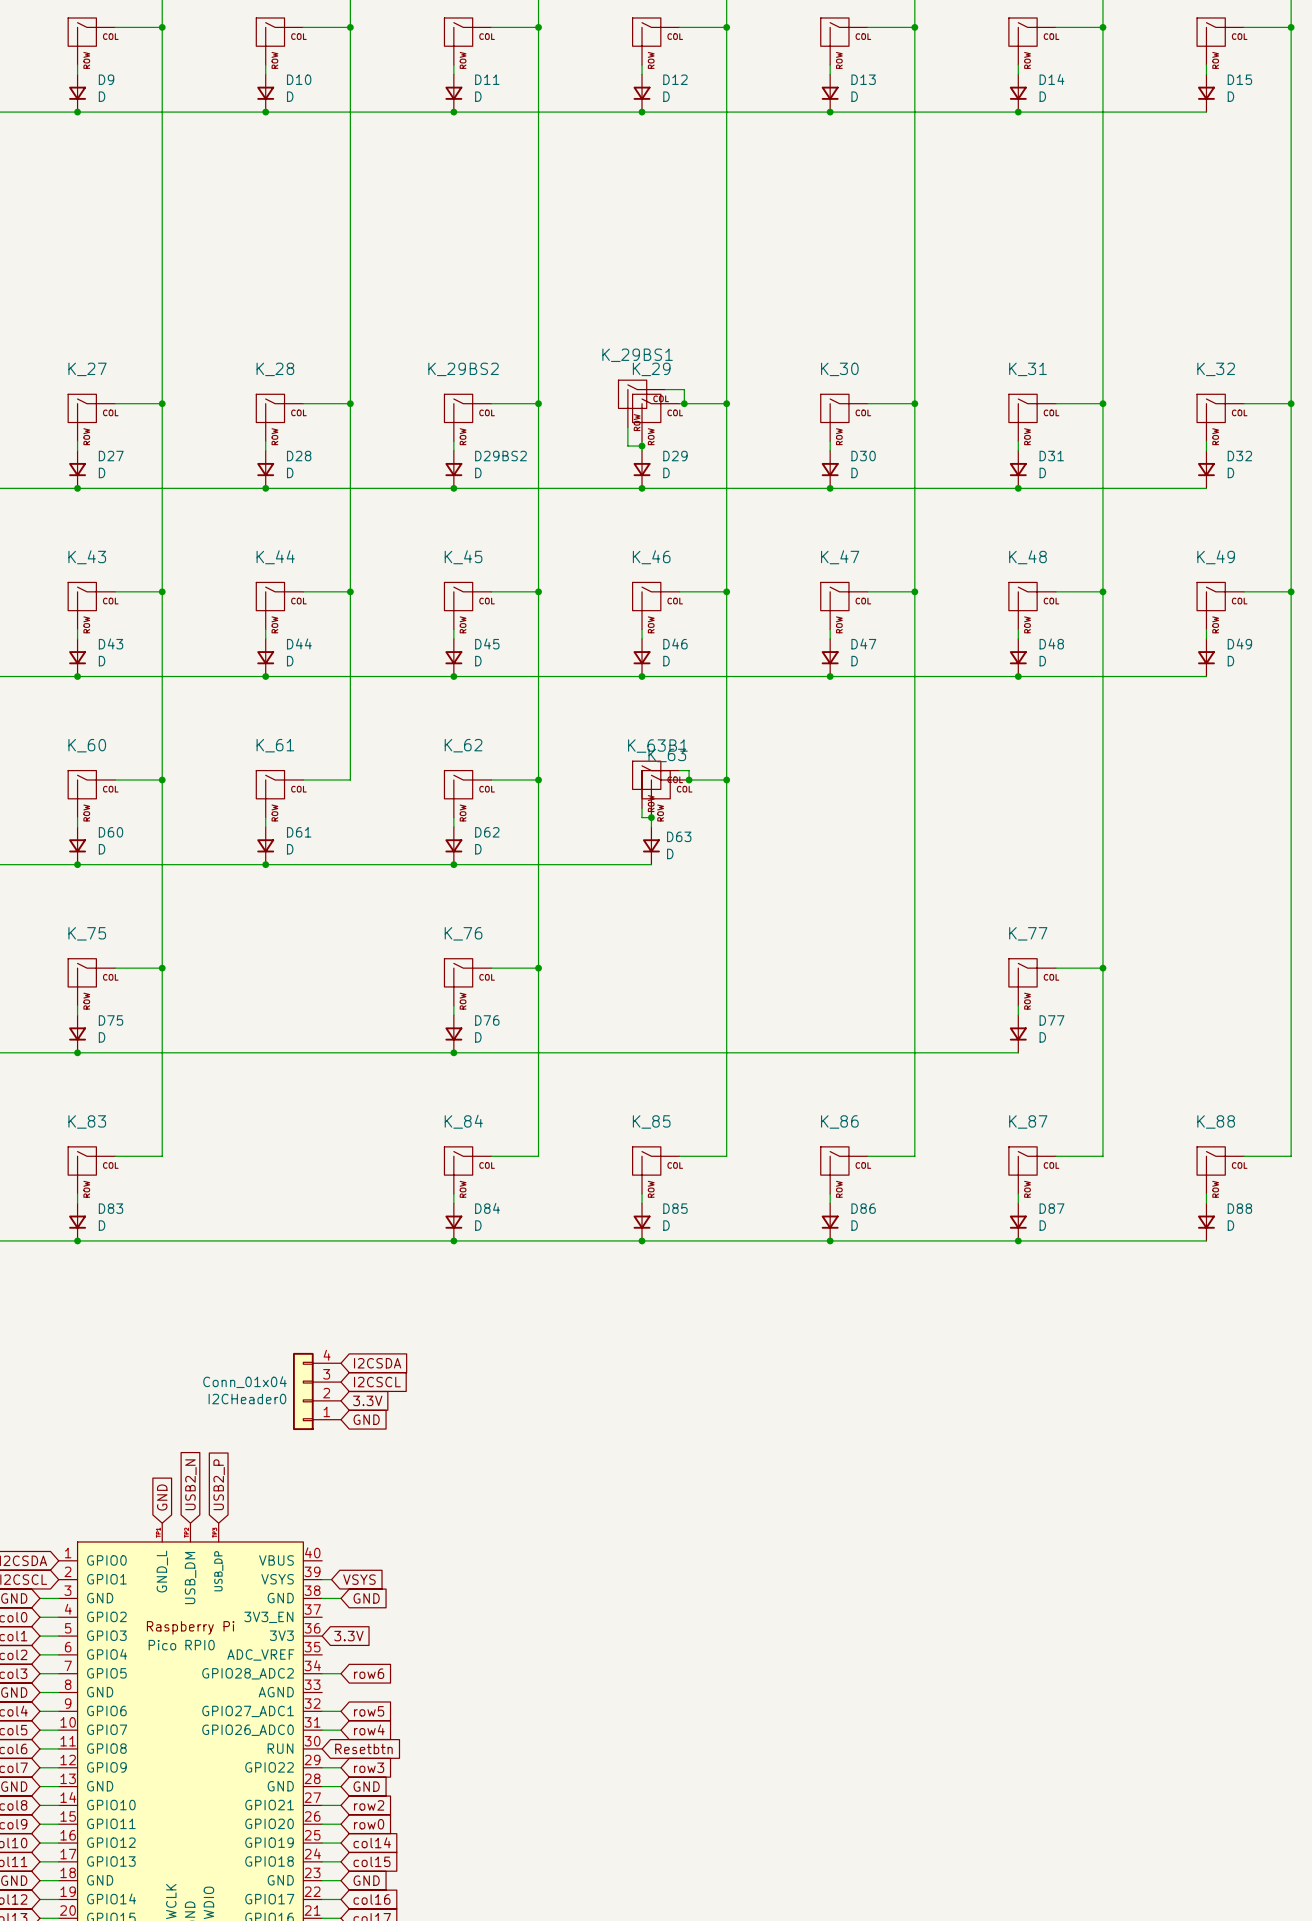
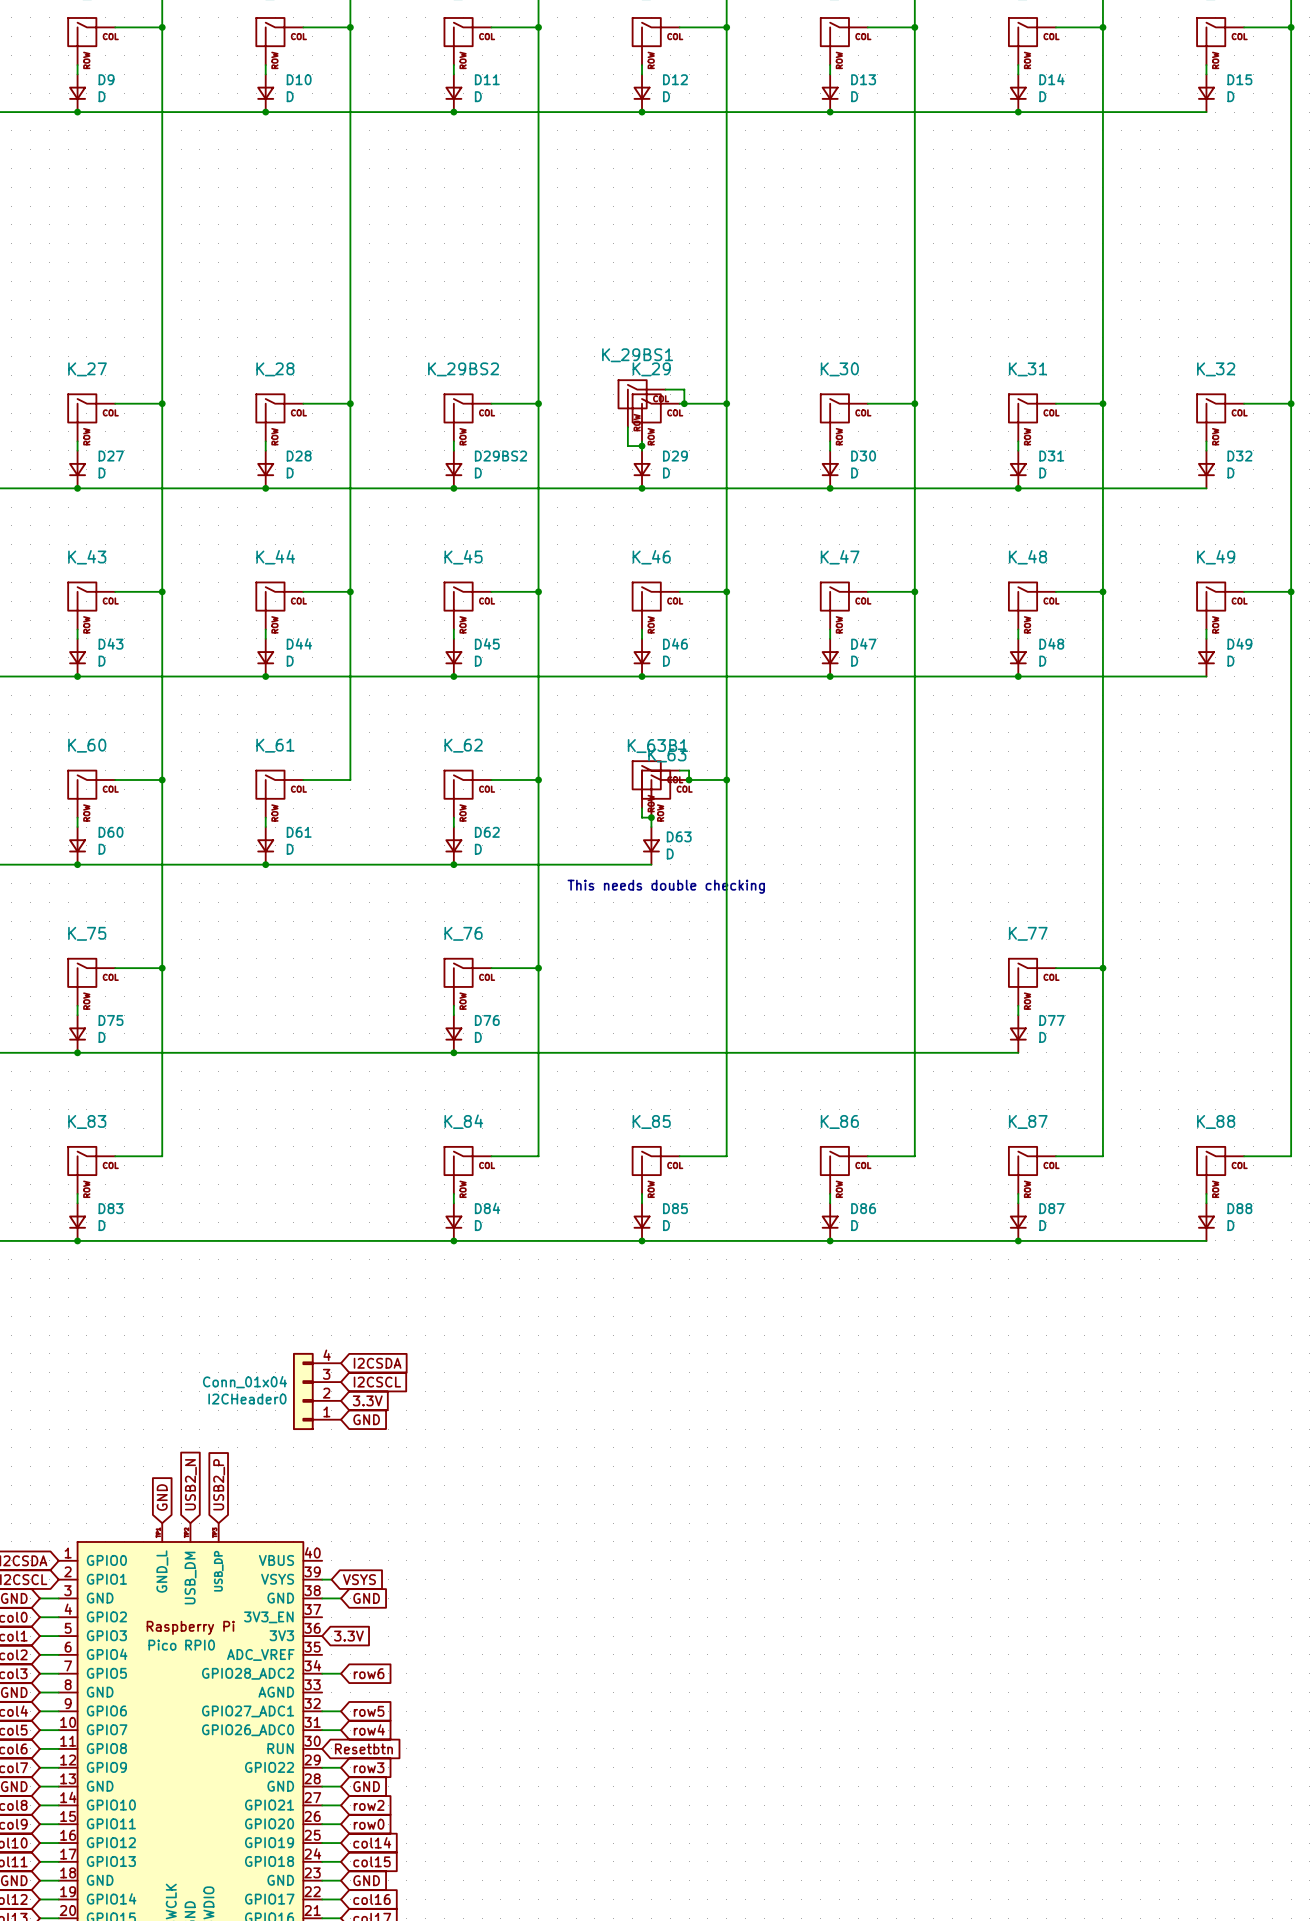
text: none -> This needs double checking (666, 886)

